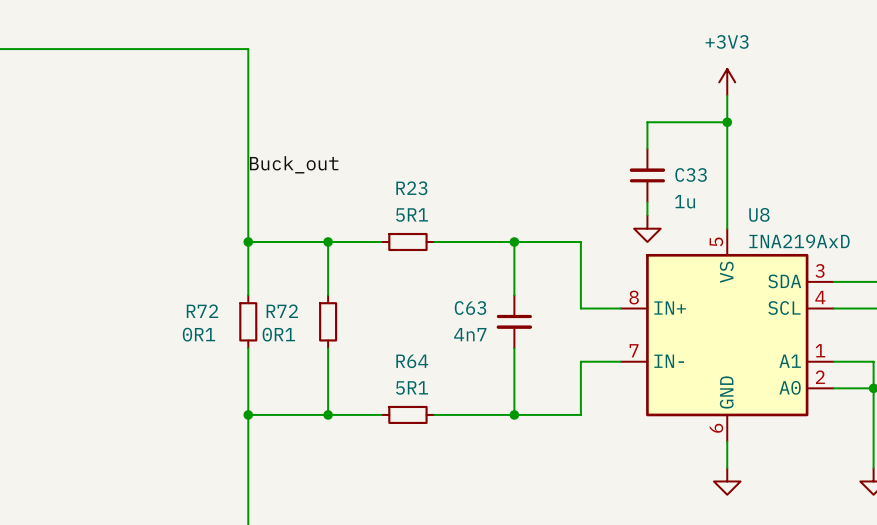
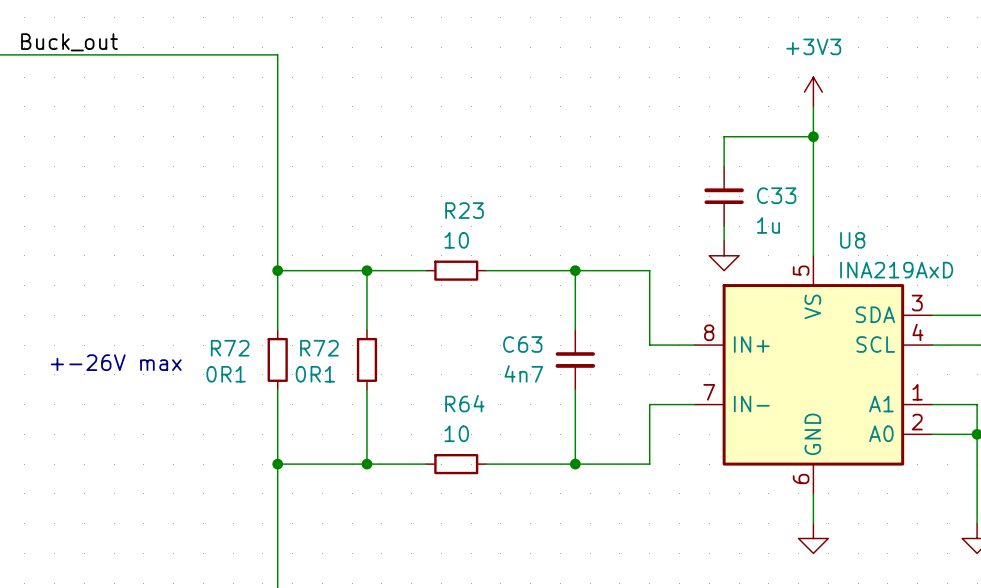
label: none -> Buck_out (69, 42)
label: Buck_out (294, 164) -> none
R23 value: 5R1 (412, 215) -> 10 (456, 240)
text: none -> +-26V max (116, 362)
R64 value: 5R1 (412, 387) -> 10 (456, 433)

